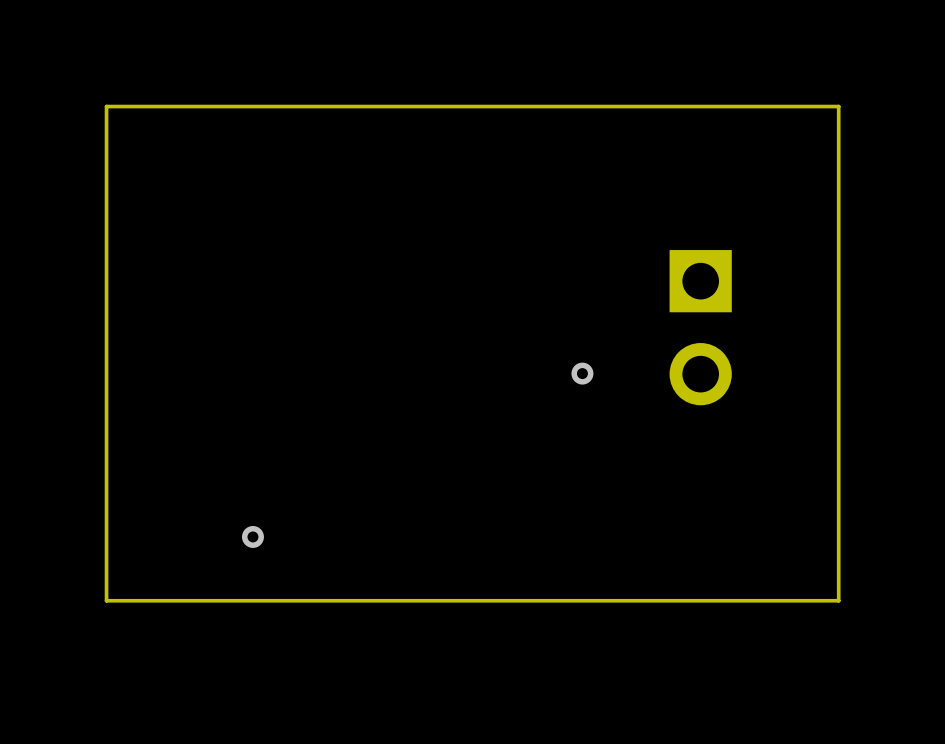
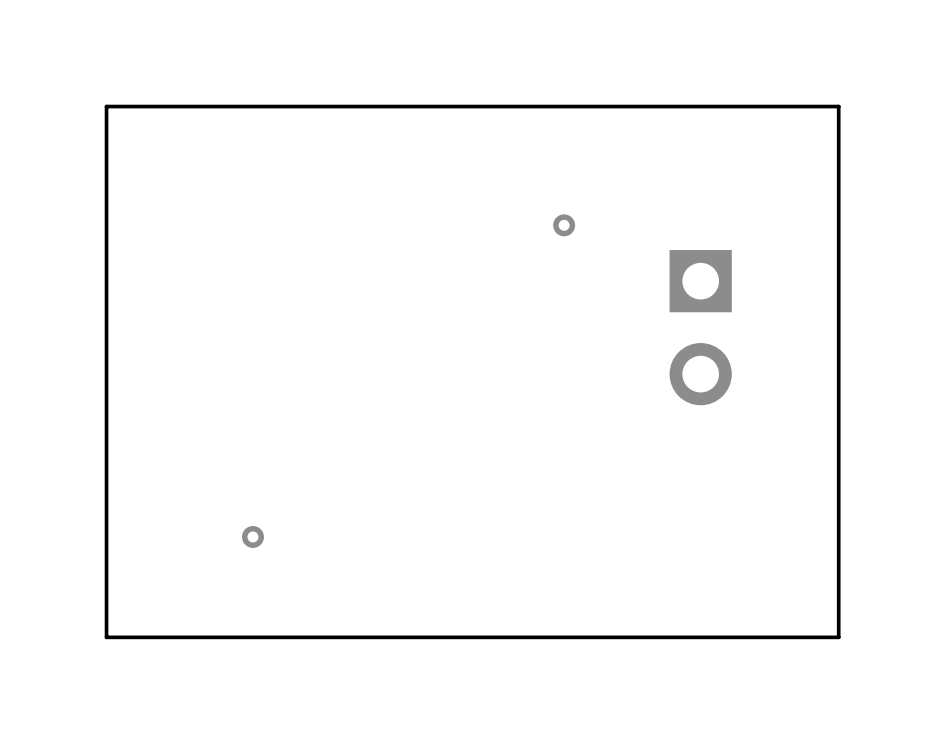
via position: (582, 373) -> (564, 225)
board edge: (838, 600) (106, 600) -> (838, 600) (838, 637) (106, 637) (106, 600)

